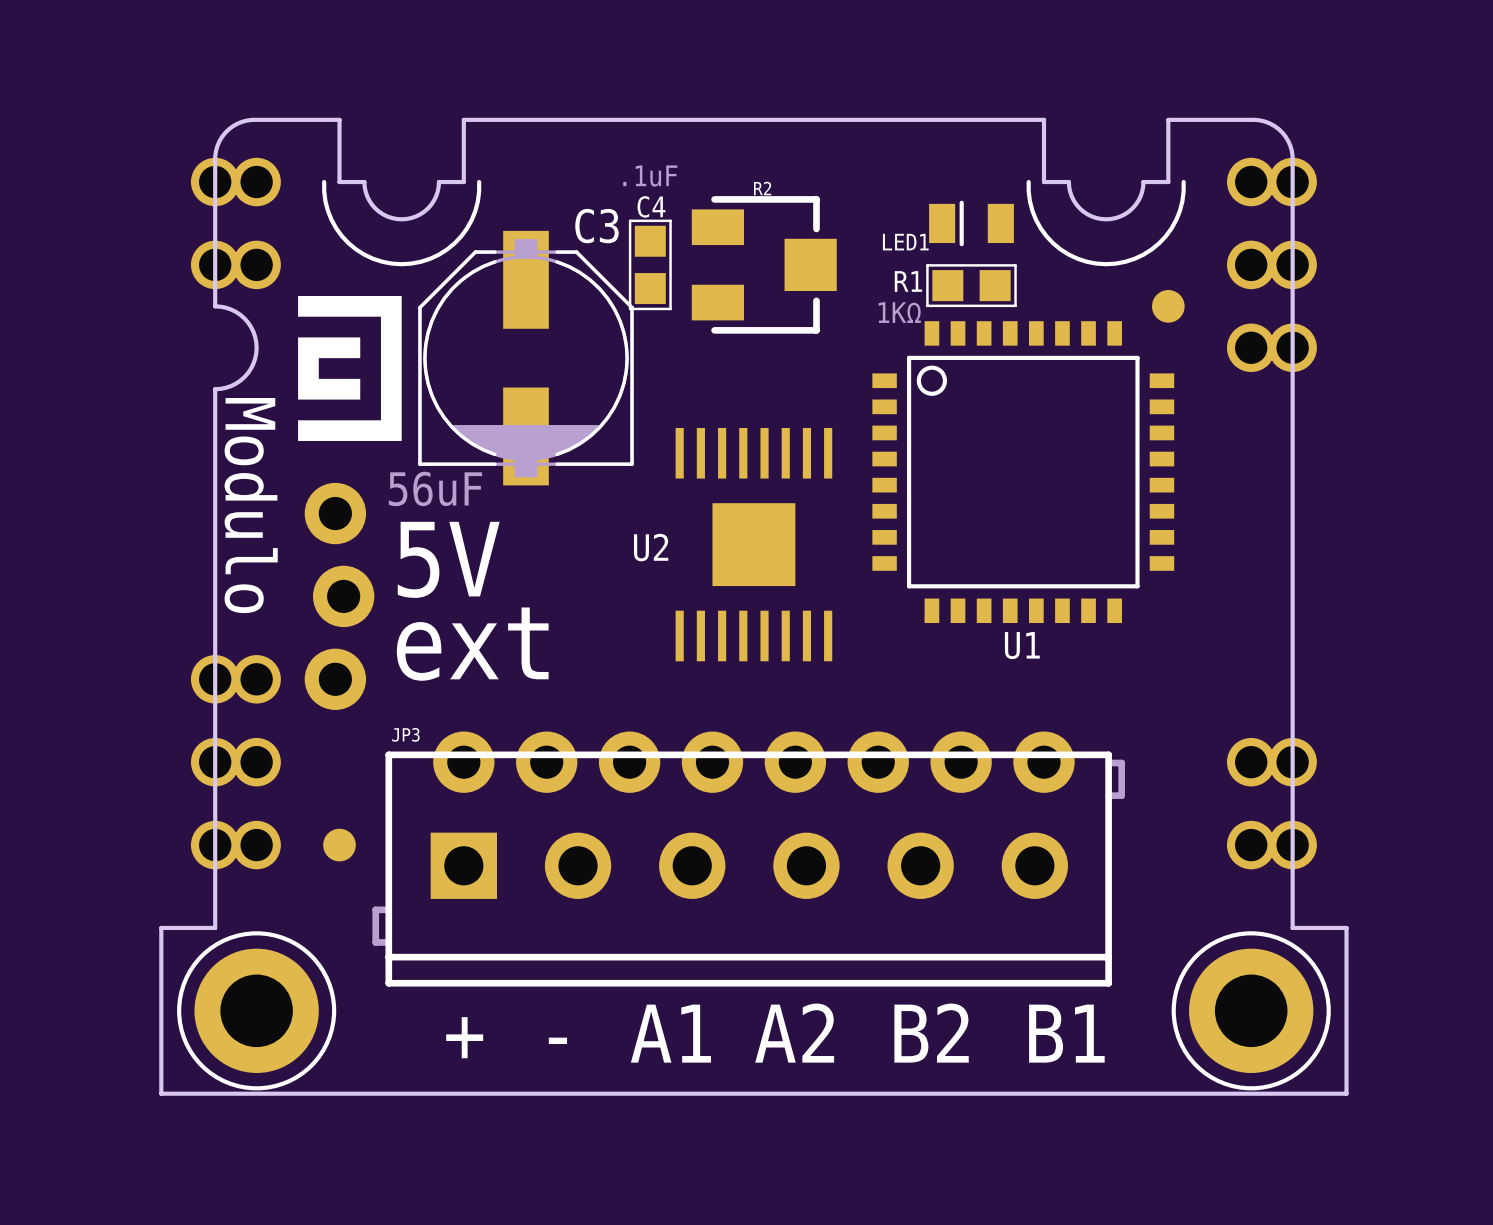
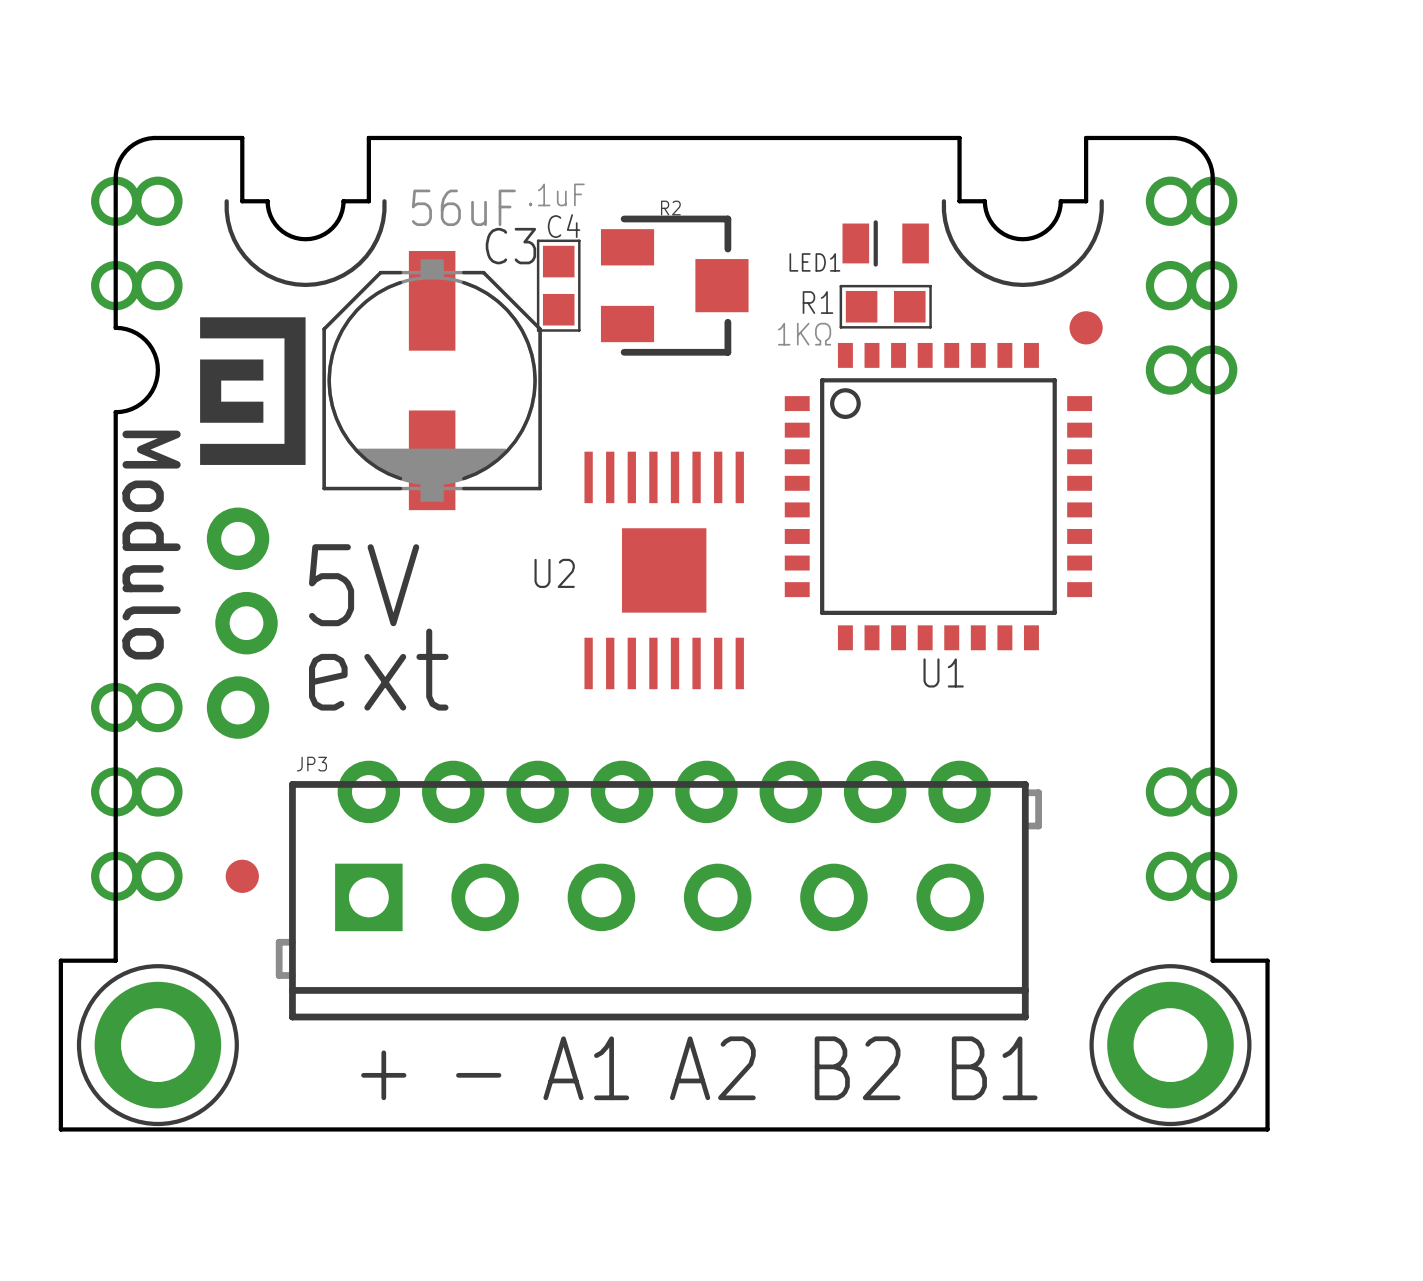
C3 value position: 56uF (435, 488) -> 56uF (463, 207)

